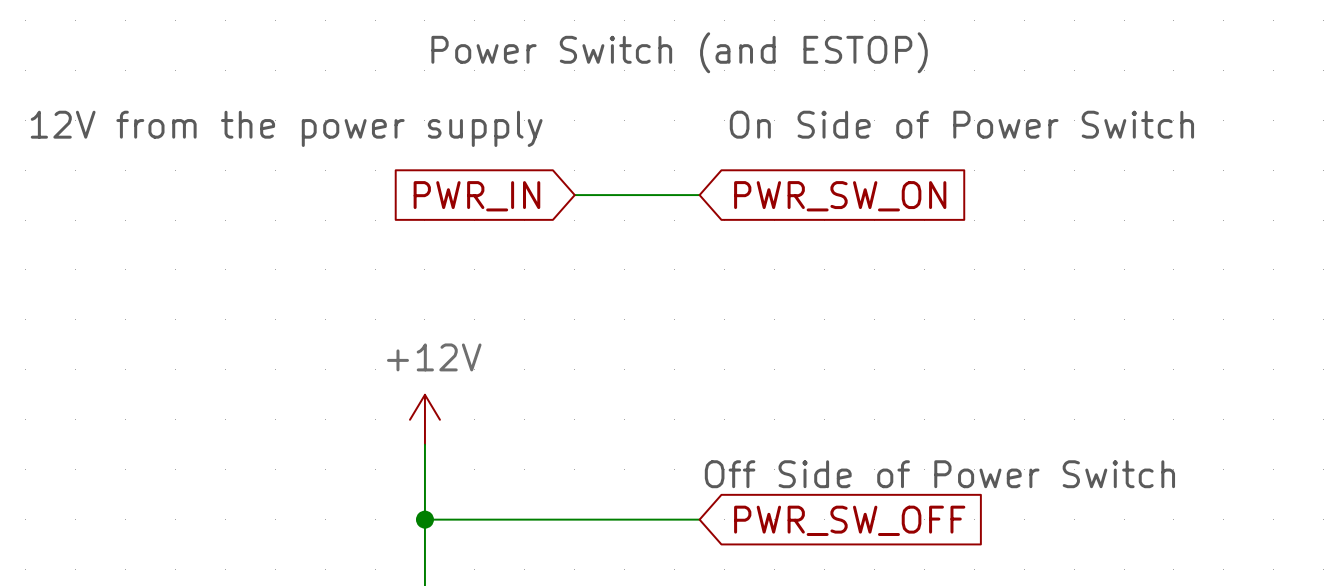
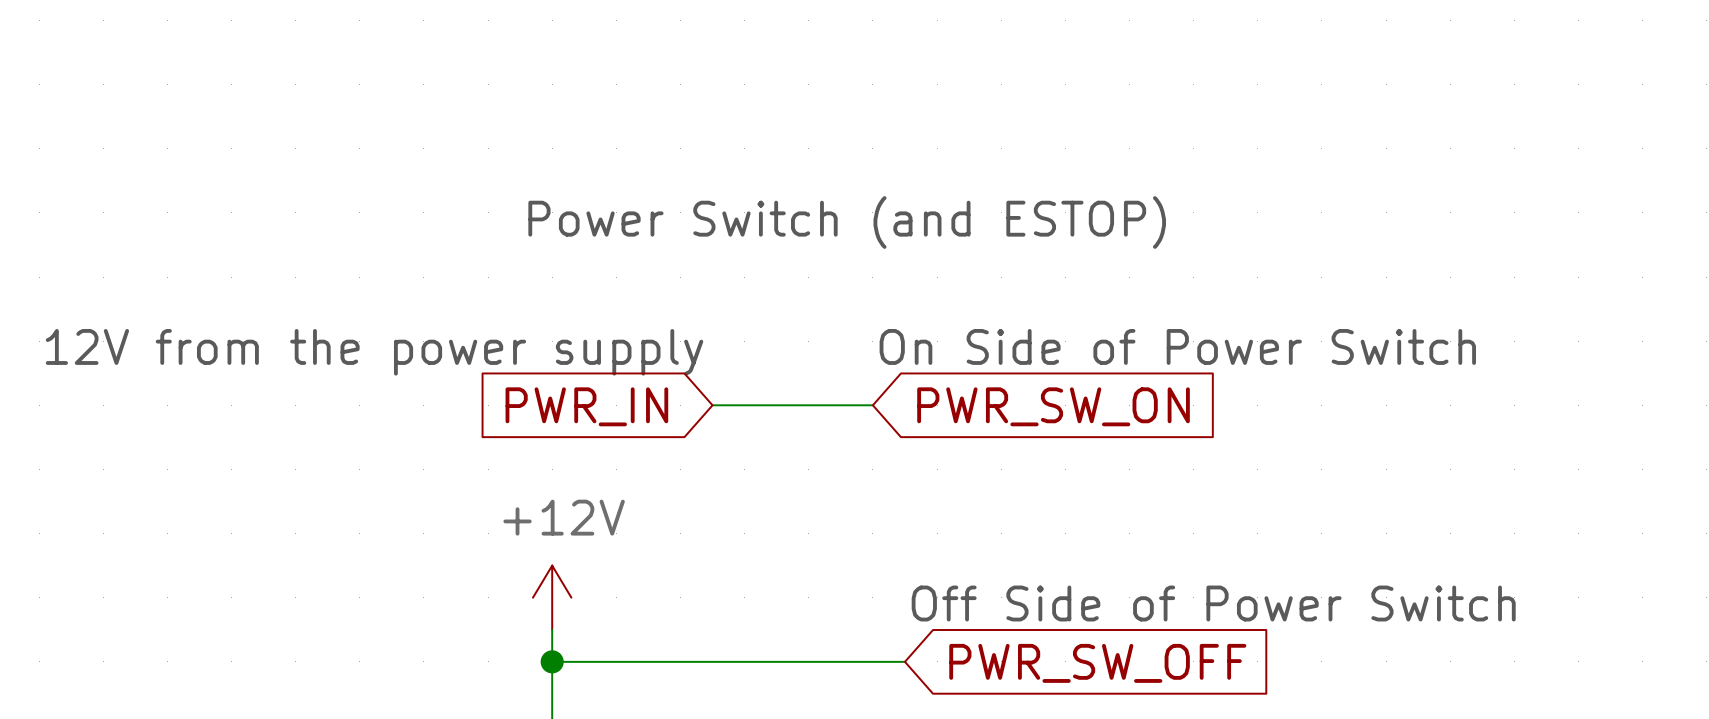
text position: Power Switch (and ESTOP) (679, 52) -> Power Switch (and ESTOP) (847, 222)
text position: On Side of Power Switch (961, 124) -> On Side of Power Switch (1177, 346)
text position: 12V from the power supply (286, 128) -> 12V from the power supply (374, 352)
wire: (574, 195) (699, 195) -> (712, 405) (872, 405)
global label position: PWR_IN (476, 196) -> PWR_IN (586, 406)
global label position: PWR_SW_ON (840, 196) -> PWR_SW_ON (1053, 406)
power symbol position: +12V (424, 419) -> +12V (552, 597)

